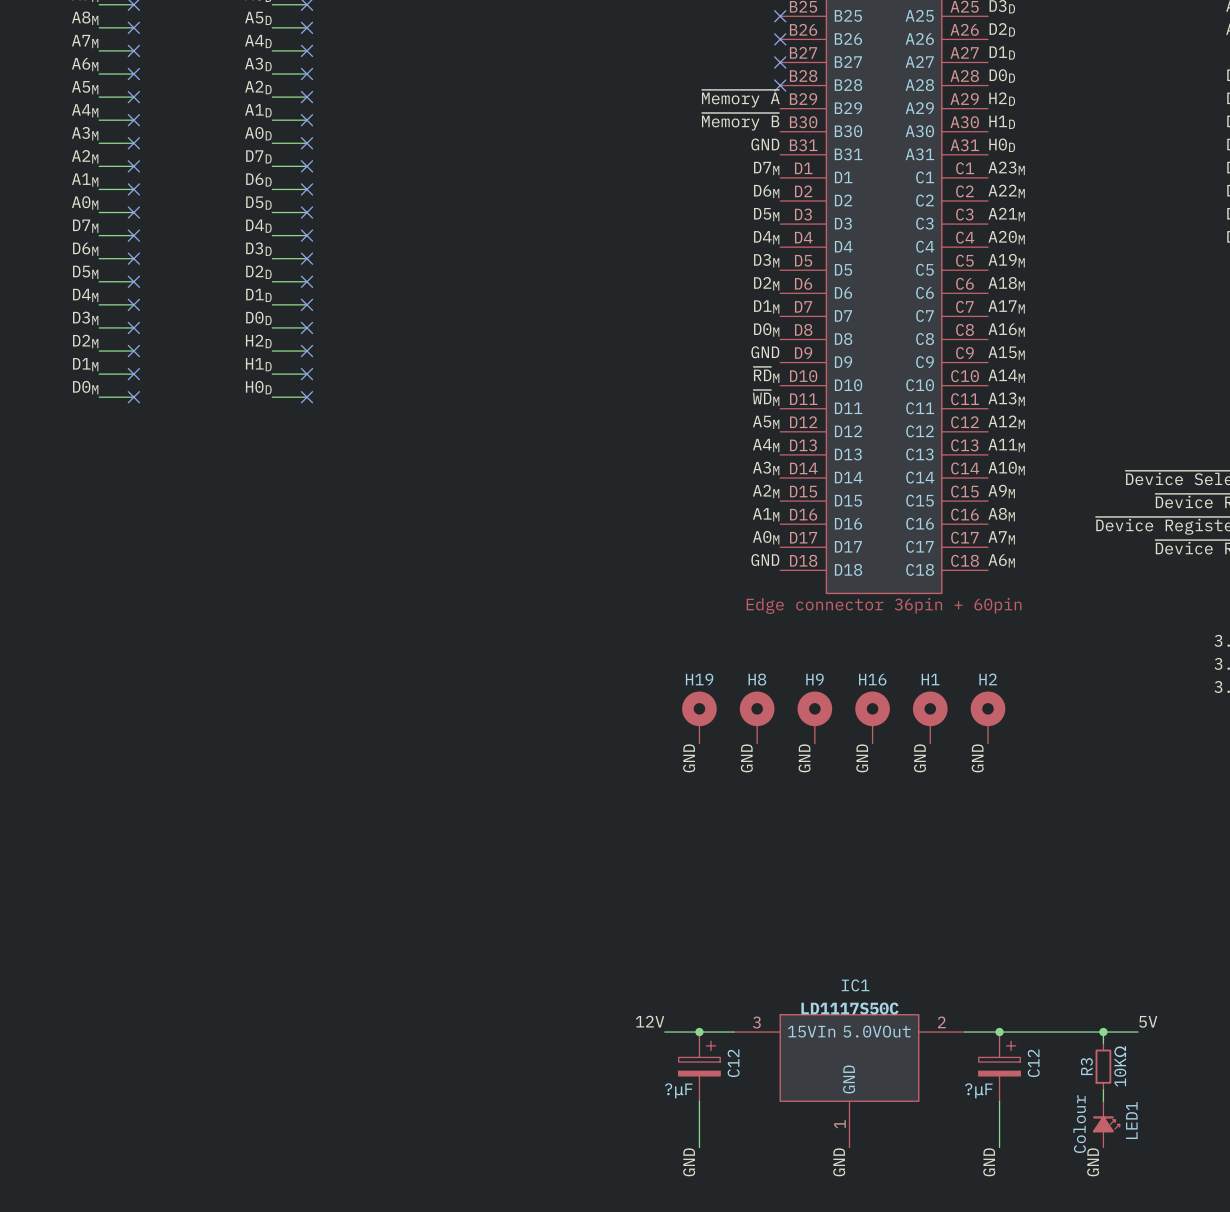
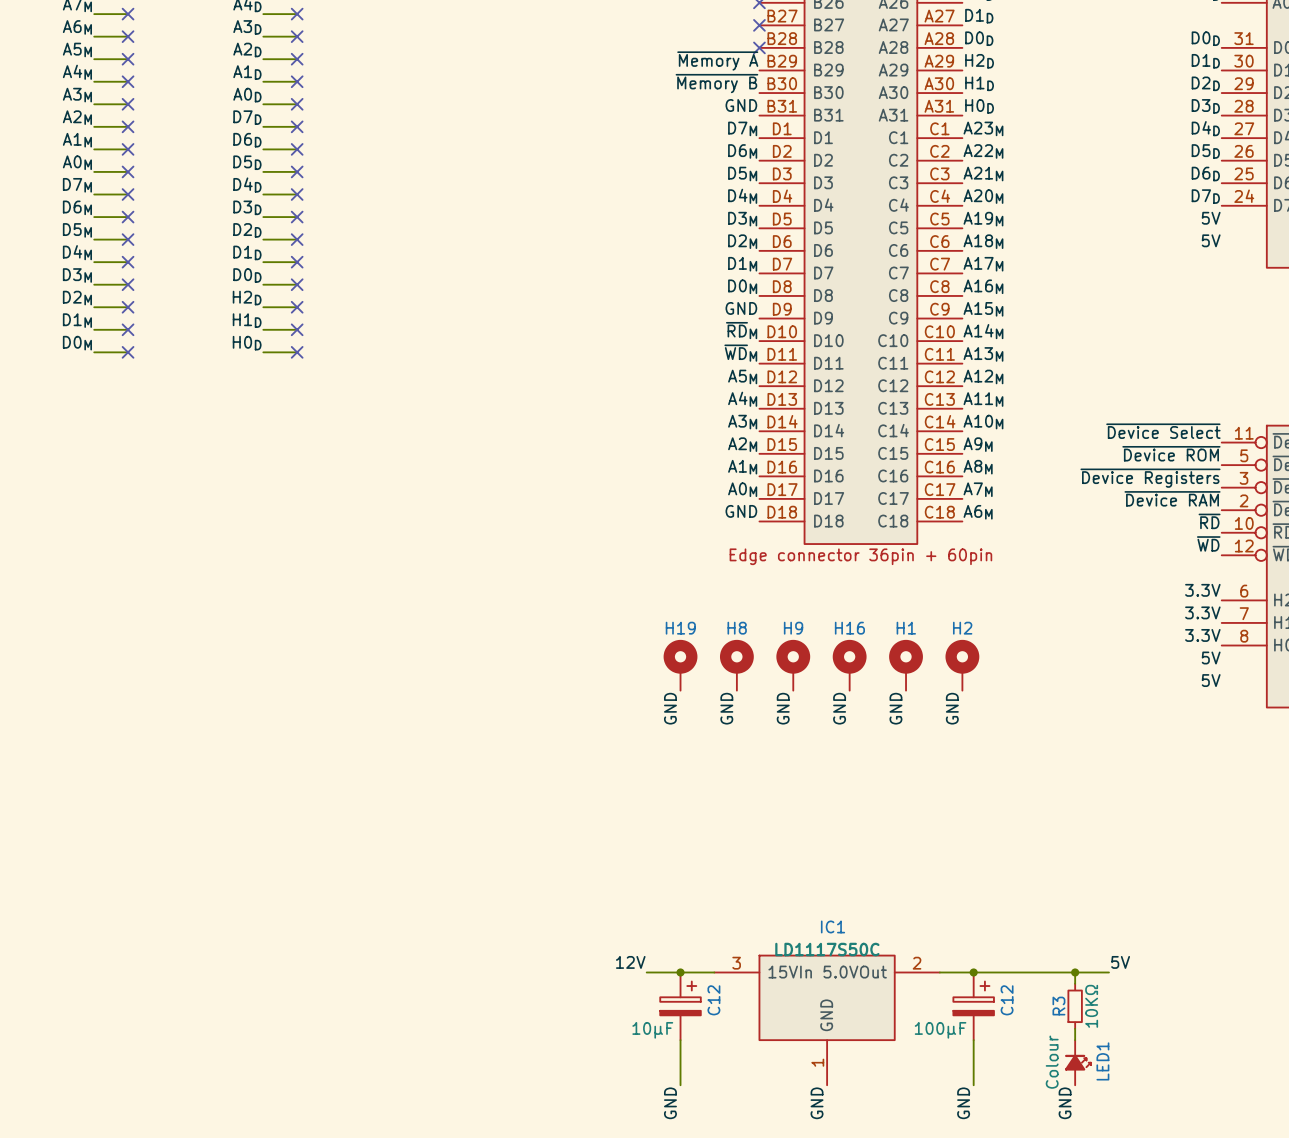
C12 text: ?μF (678, 1090) -> 10μF (652, 1030)
C12 text: ?μF (978, 1090) -> 100μF (940, 1030)

